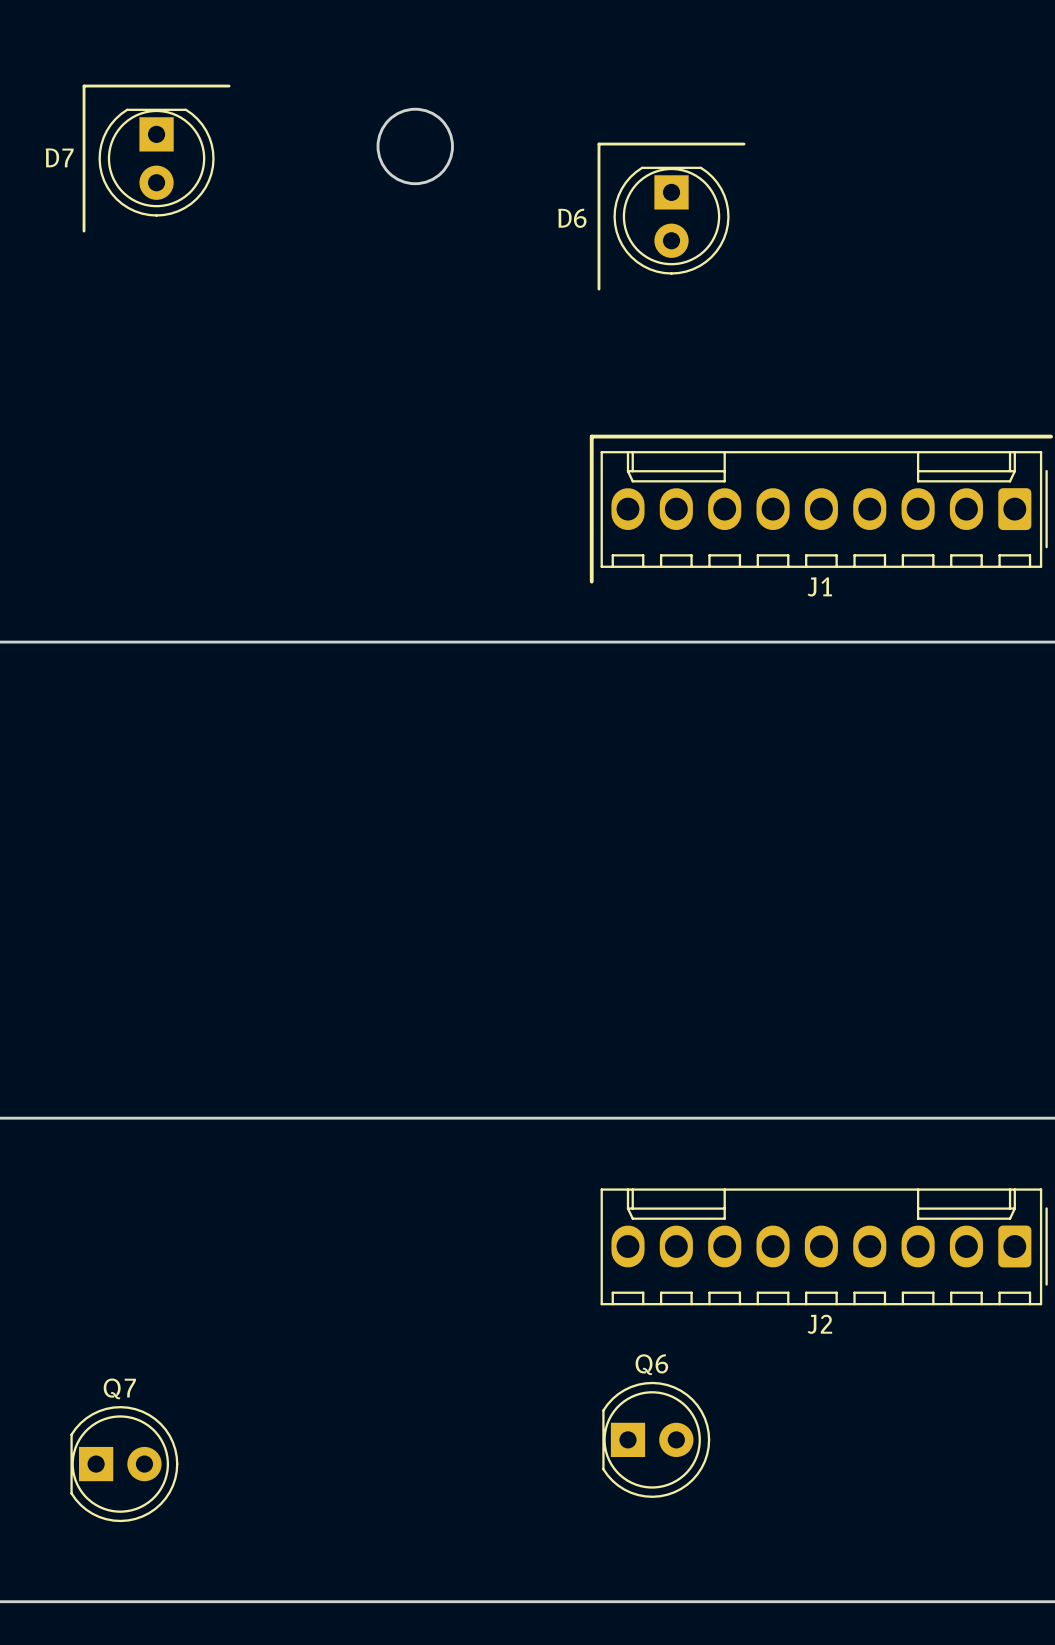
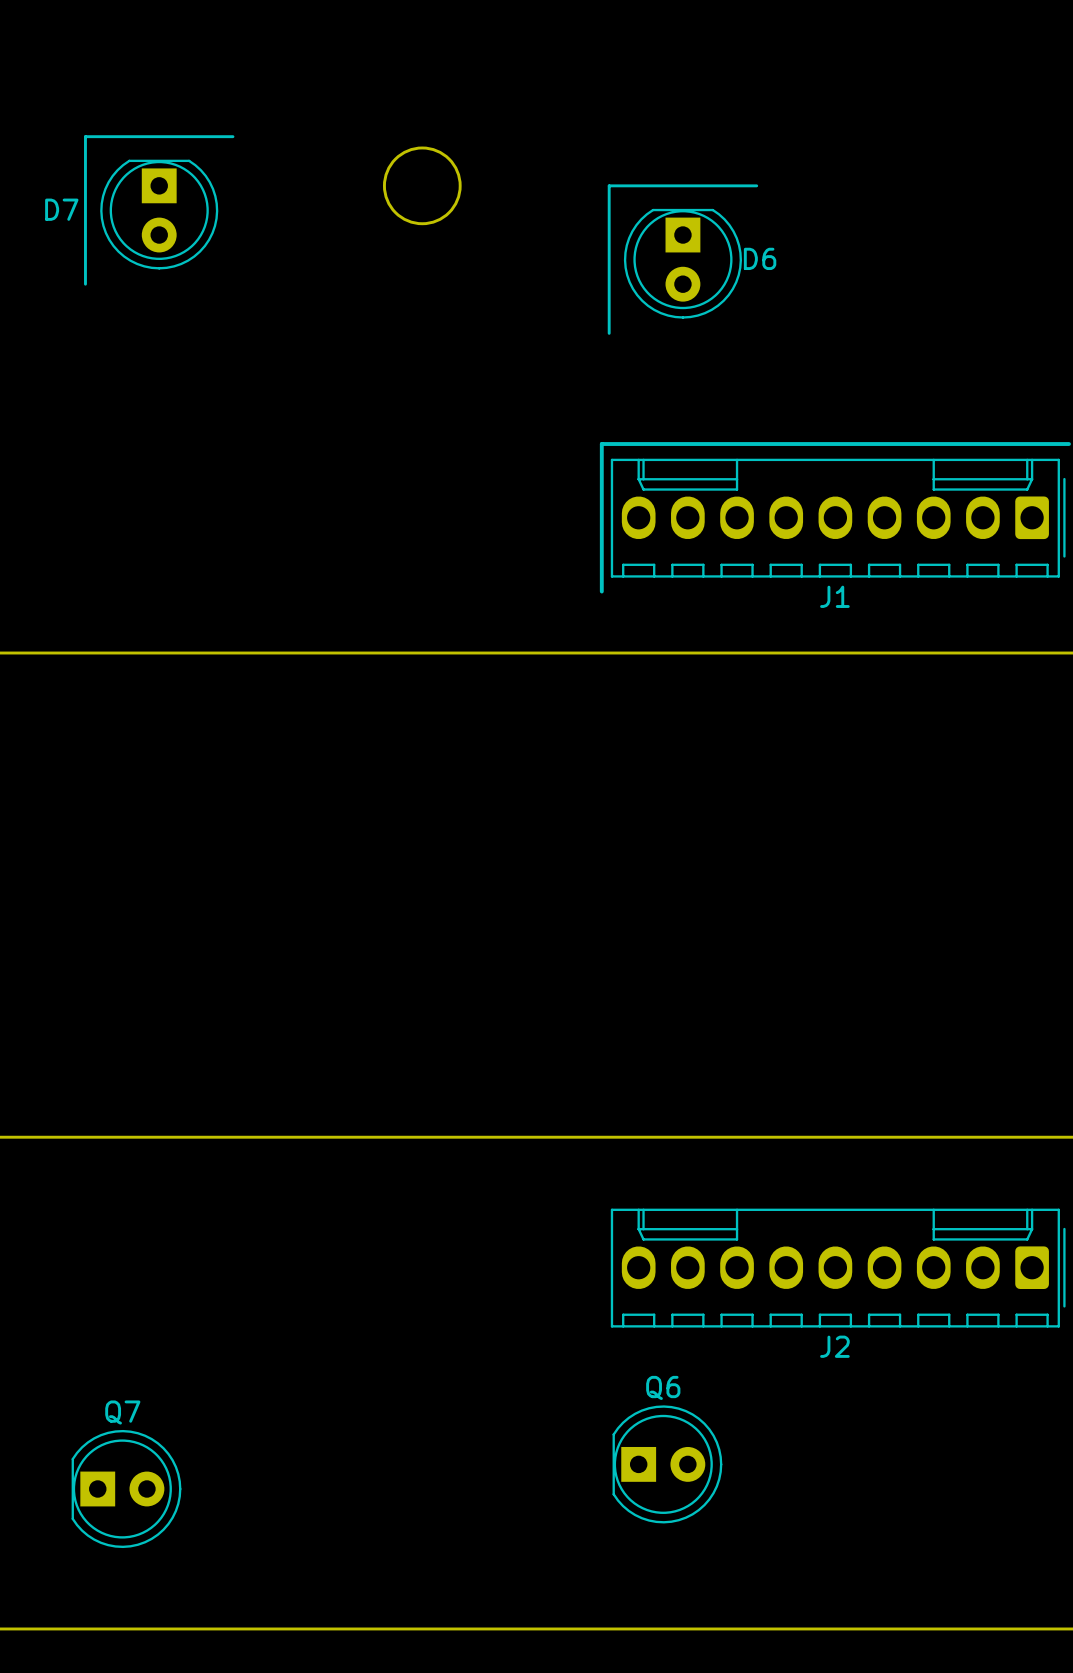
line: (229, 86) (84, 86) (84, 134) -> (232, 136) (85, 136)
line: (744, 144) (598, 144) (598, 182) -> (756, 185) (609, 185)
round board edge position: (415, 146) -> (422, 185)
D7 position: (156, 162) -> (159, 214)
D6 name position: D6 (572, 218) -> D6 (760, 258)
D6 position: (671, 220) -> (682, 263)
line: none -> (85, 235) (85, 284)
line: none -> (609, 294) (609, 333)

